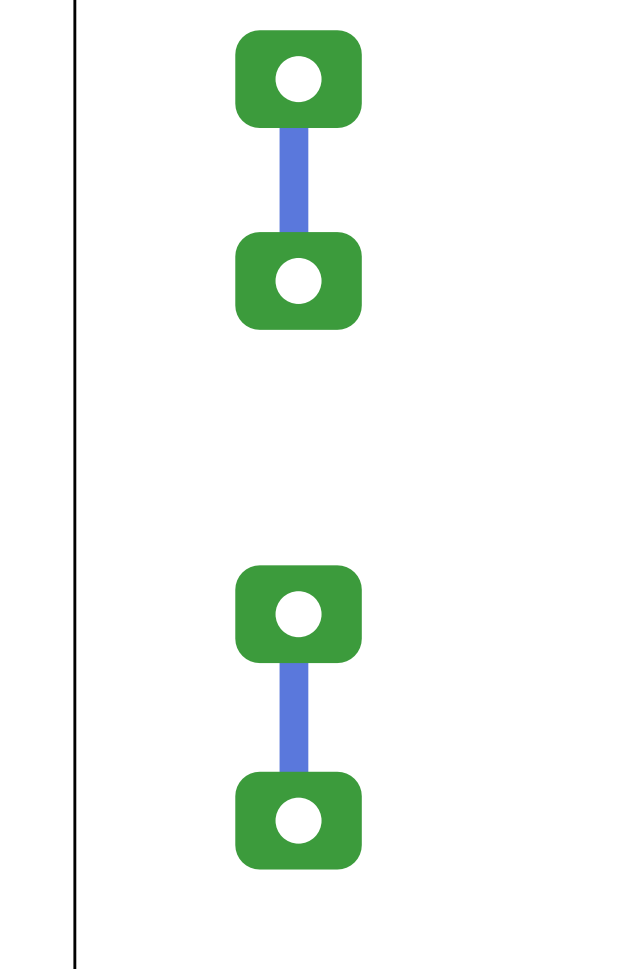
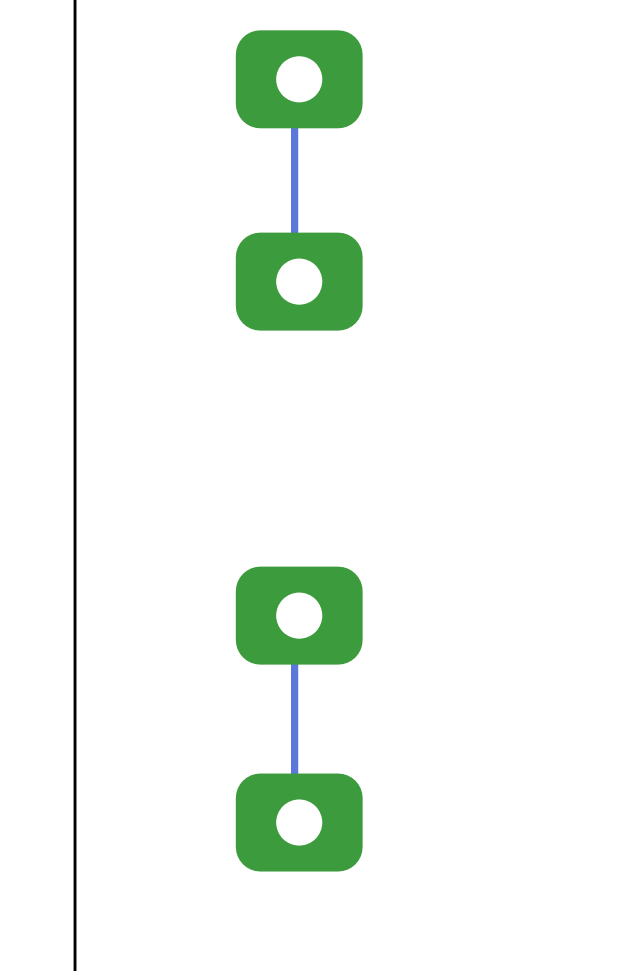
bottom track width: thick (298, 79) (293, 78) (293, 279) (298, 280) -> thin (299, 79) (294, 78) (294, 280) (299, 281)
bottom track width: thick (298, 614) (293, 608) (293, 827) (298, 820) -> thin (299, 615) (294, 609) (294, 829) (299, 822)

